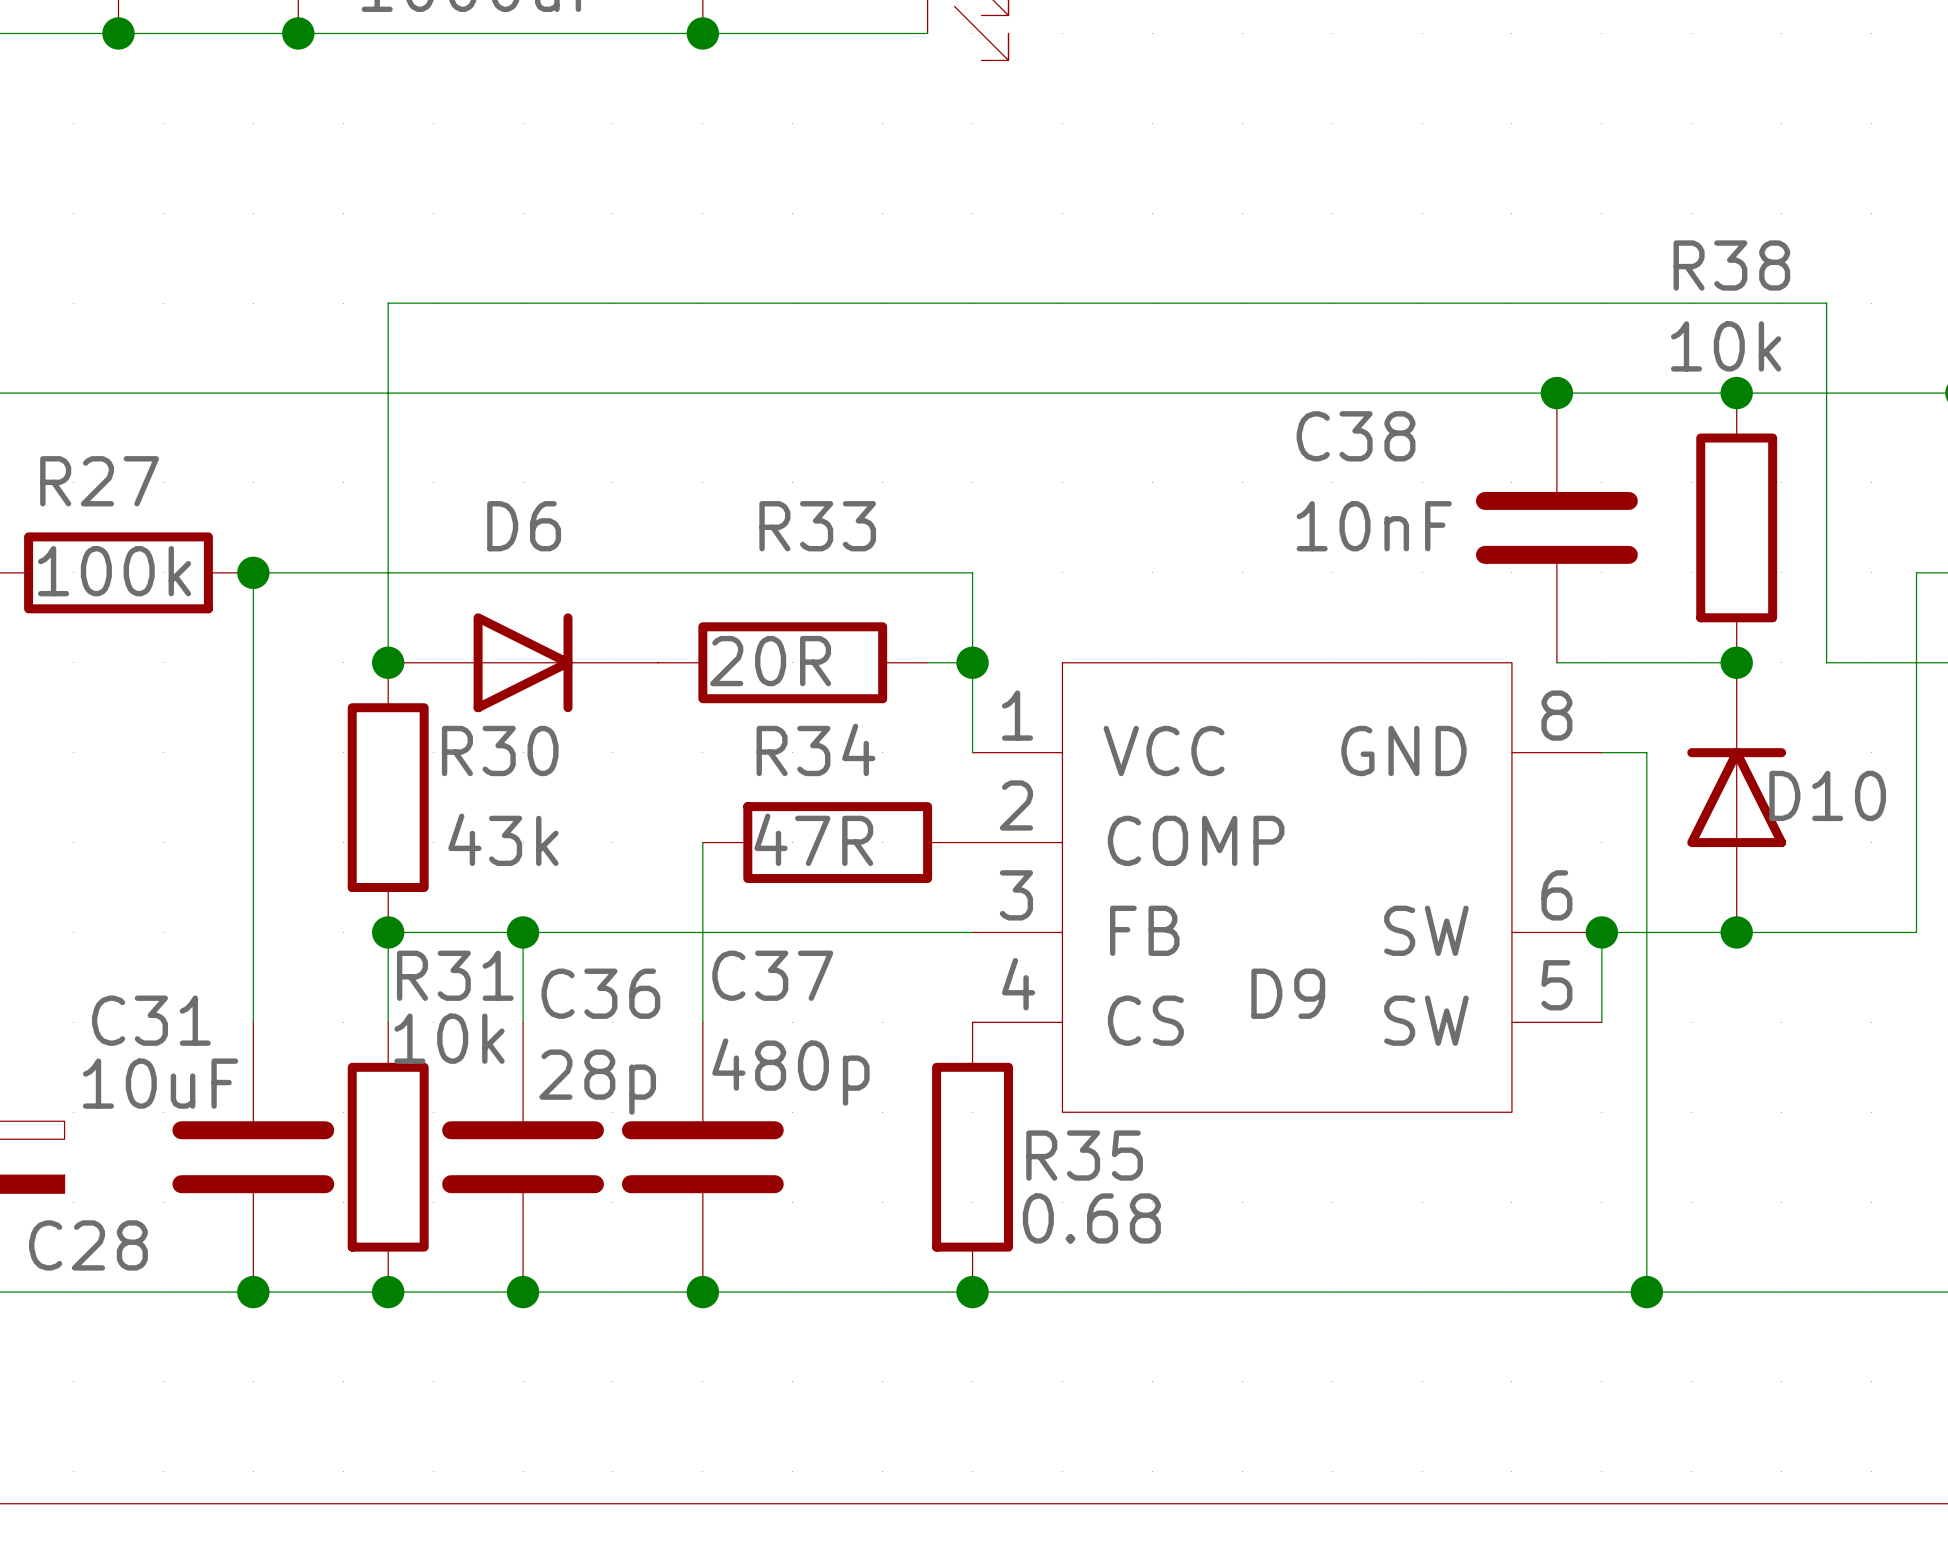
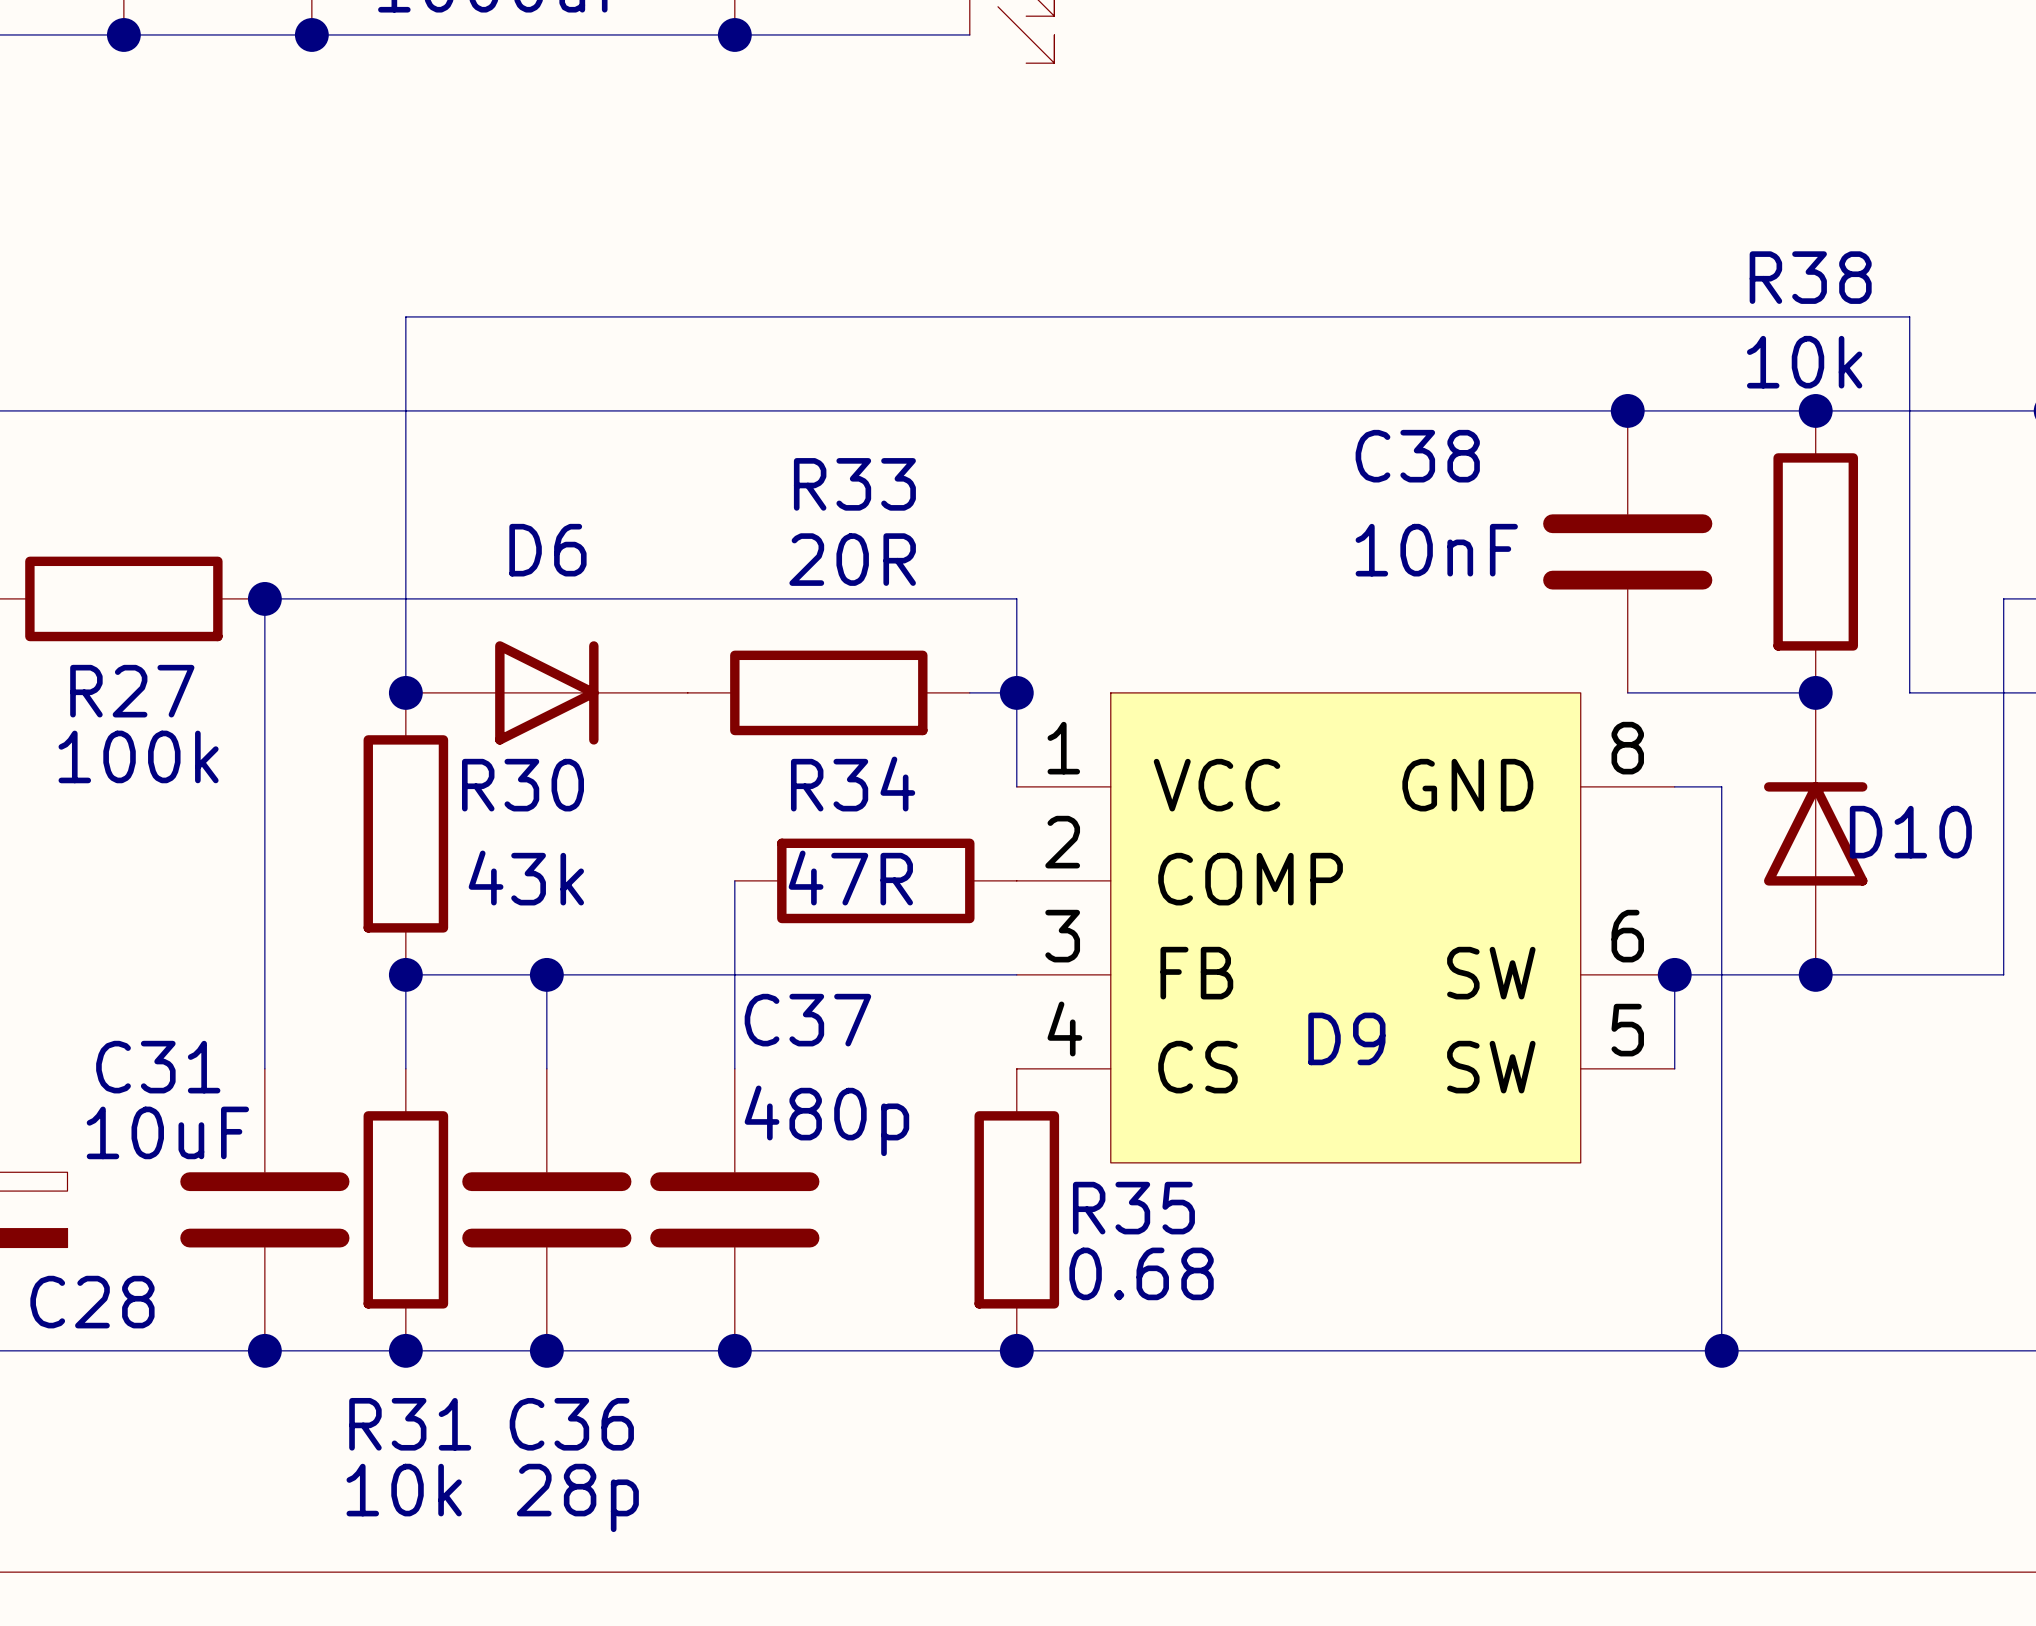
R27 name position: R27 (99, 481) -> R27 (132, 691)
R33 name position: R33 (817, 526) -> R33 (854, 484)
R27 value position: 100k (114, 571) -> 100k (138, 756)
R33 value position: 20R (770, 661) -> 20R (852, 559)
R31 name position: R31 (455, 975) -> R31 (410, 1424)
C36 name position: C36 (600, 993) -> C36 (571, 1424)
R31 value position: 10k (449, 1038) -> 10k (404, 1490)
C36 value position: 28p (597, 1082) -> 28p (577, 1497)

